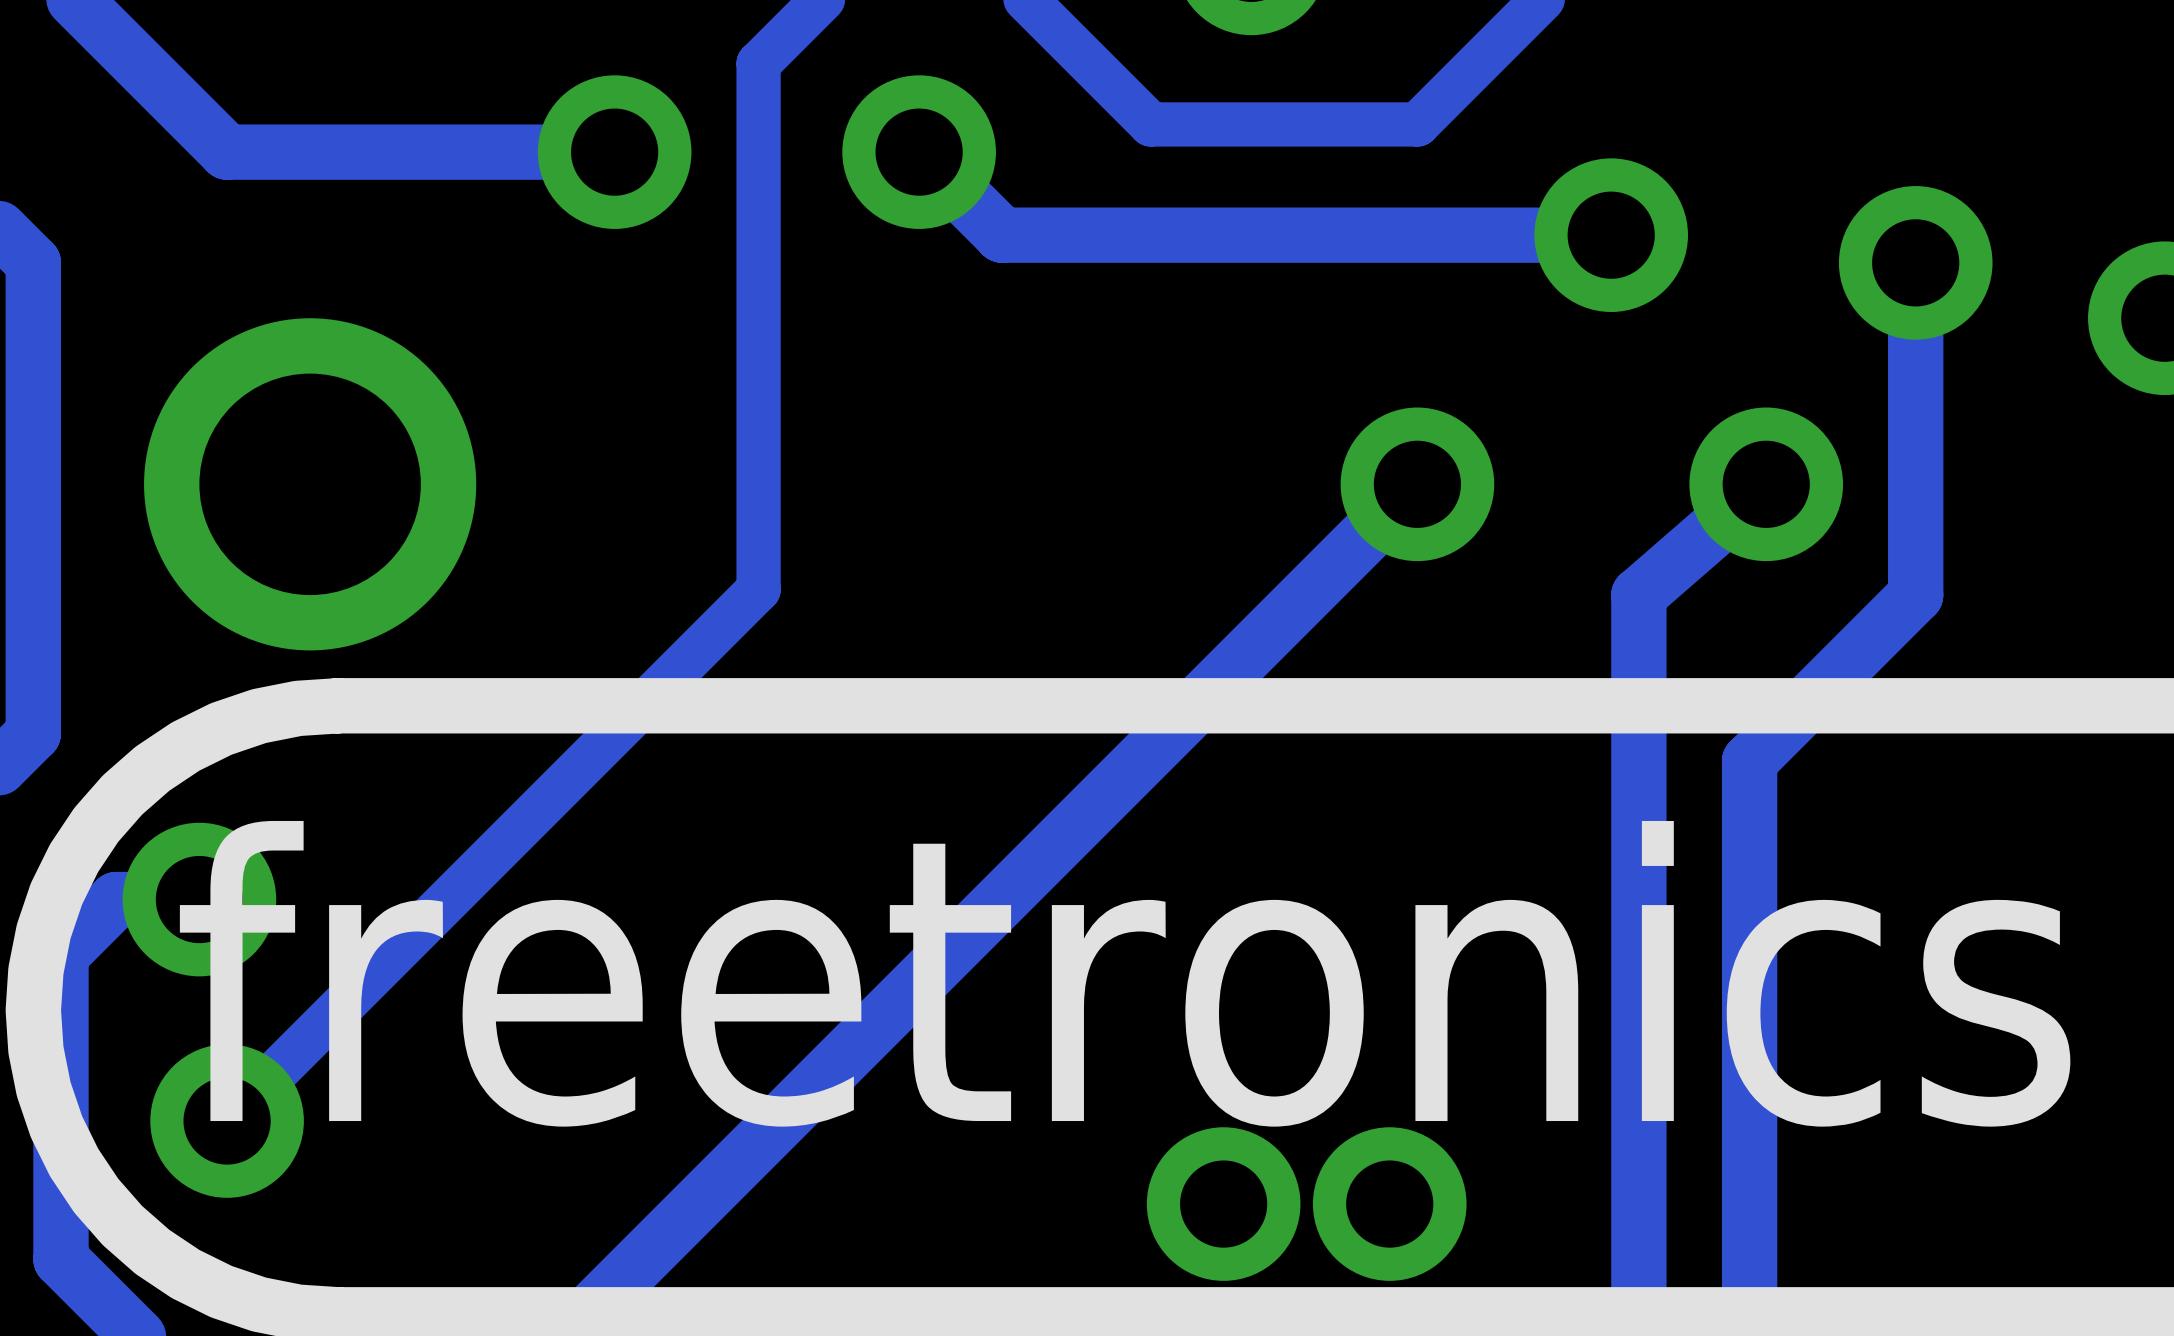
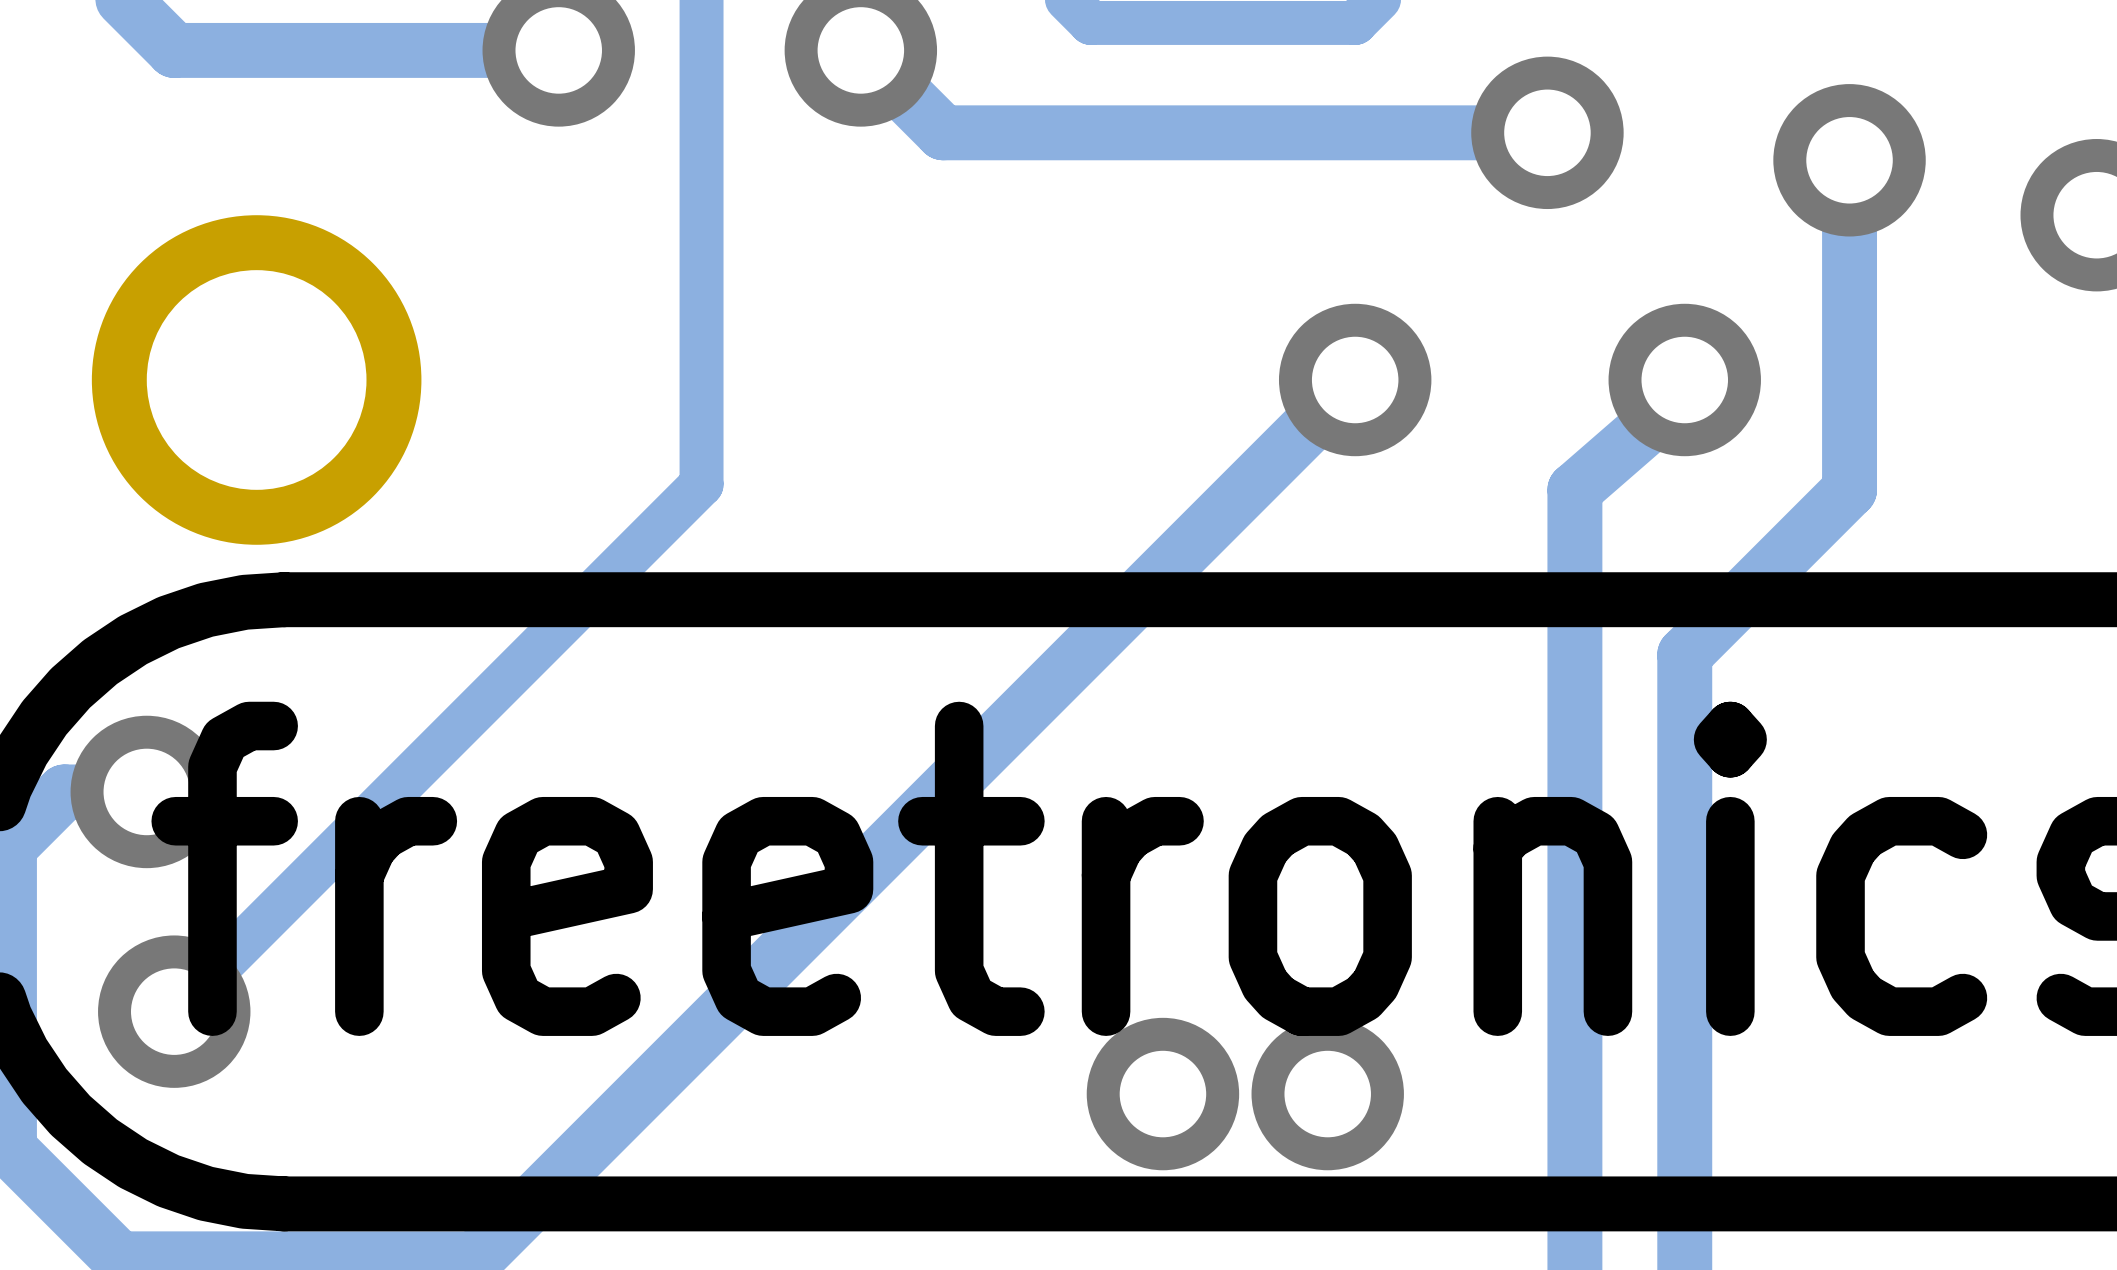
via position: (1766, 484) -> (1684, 379)

